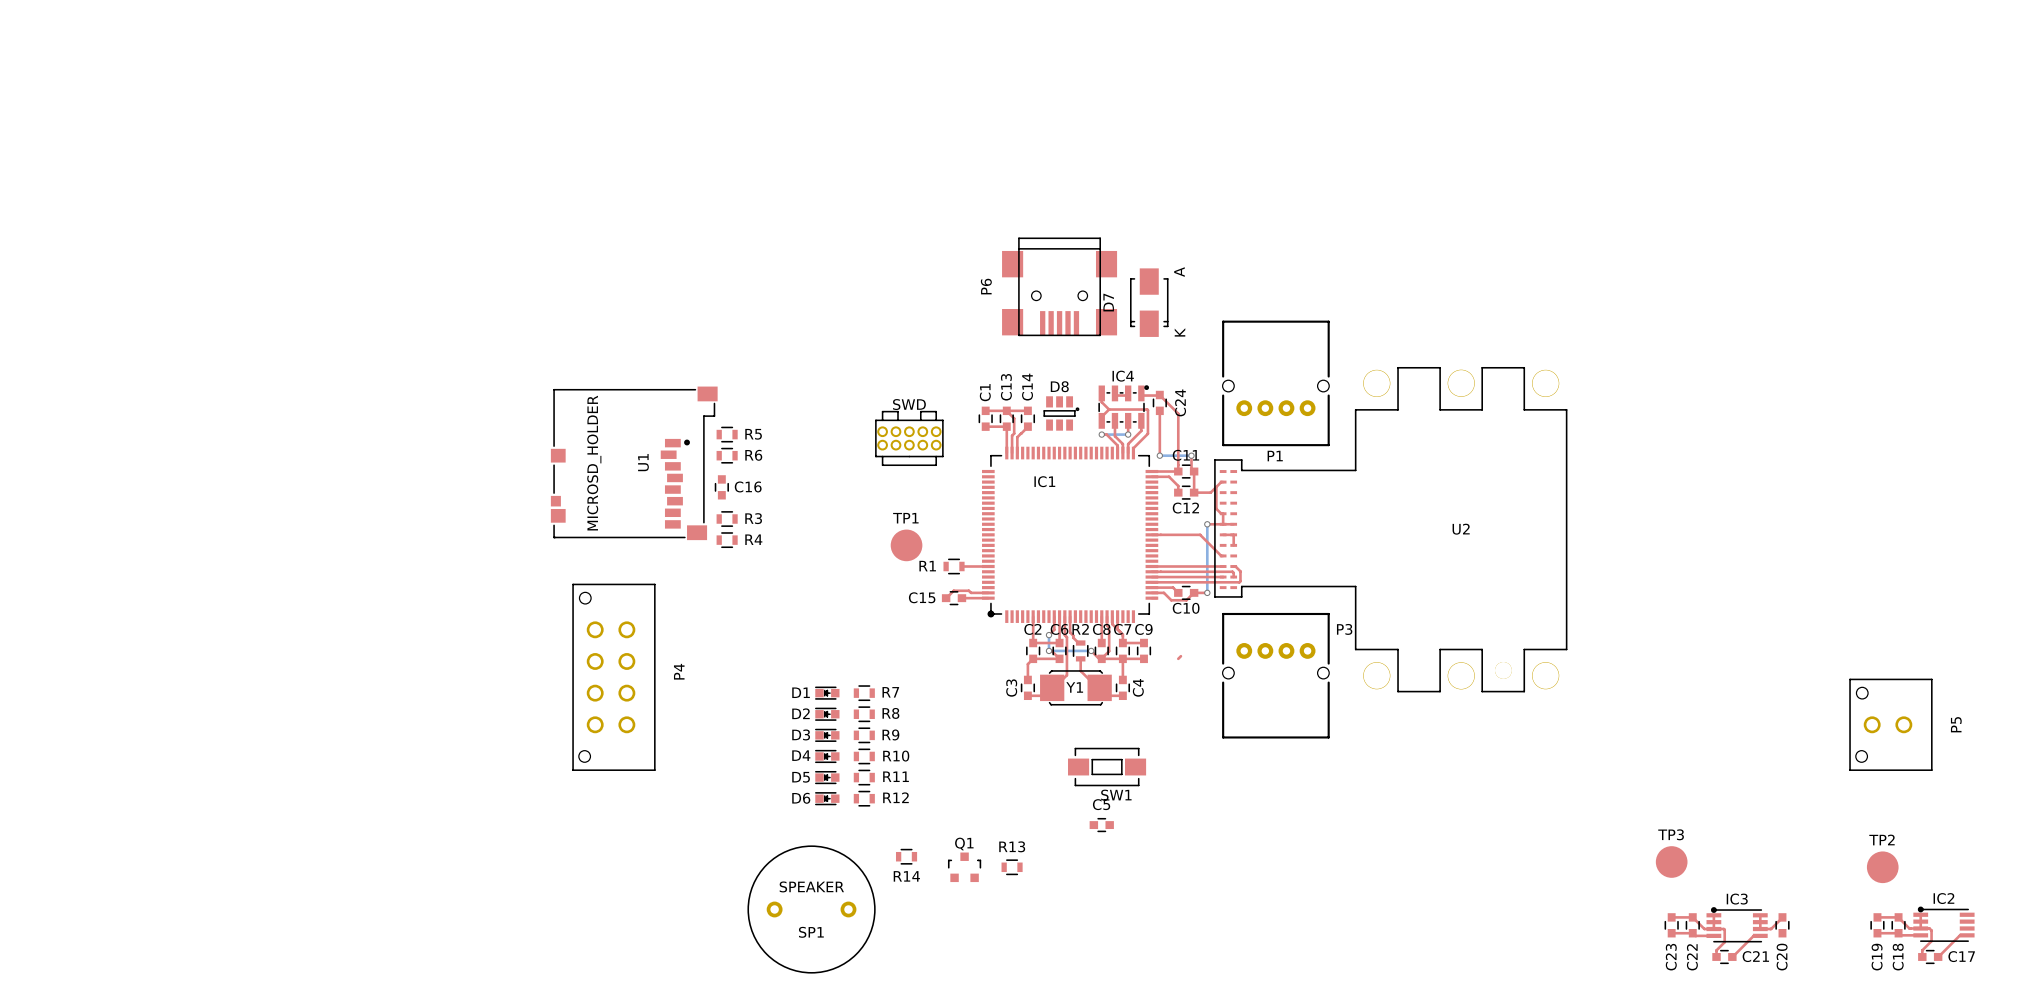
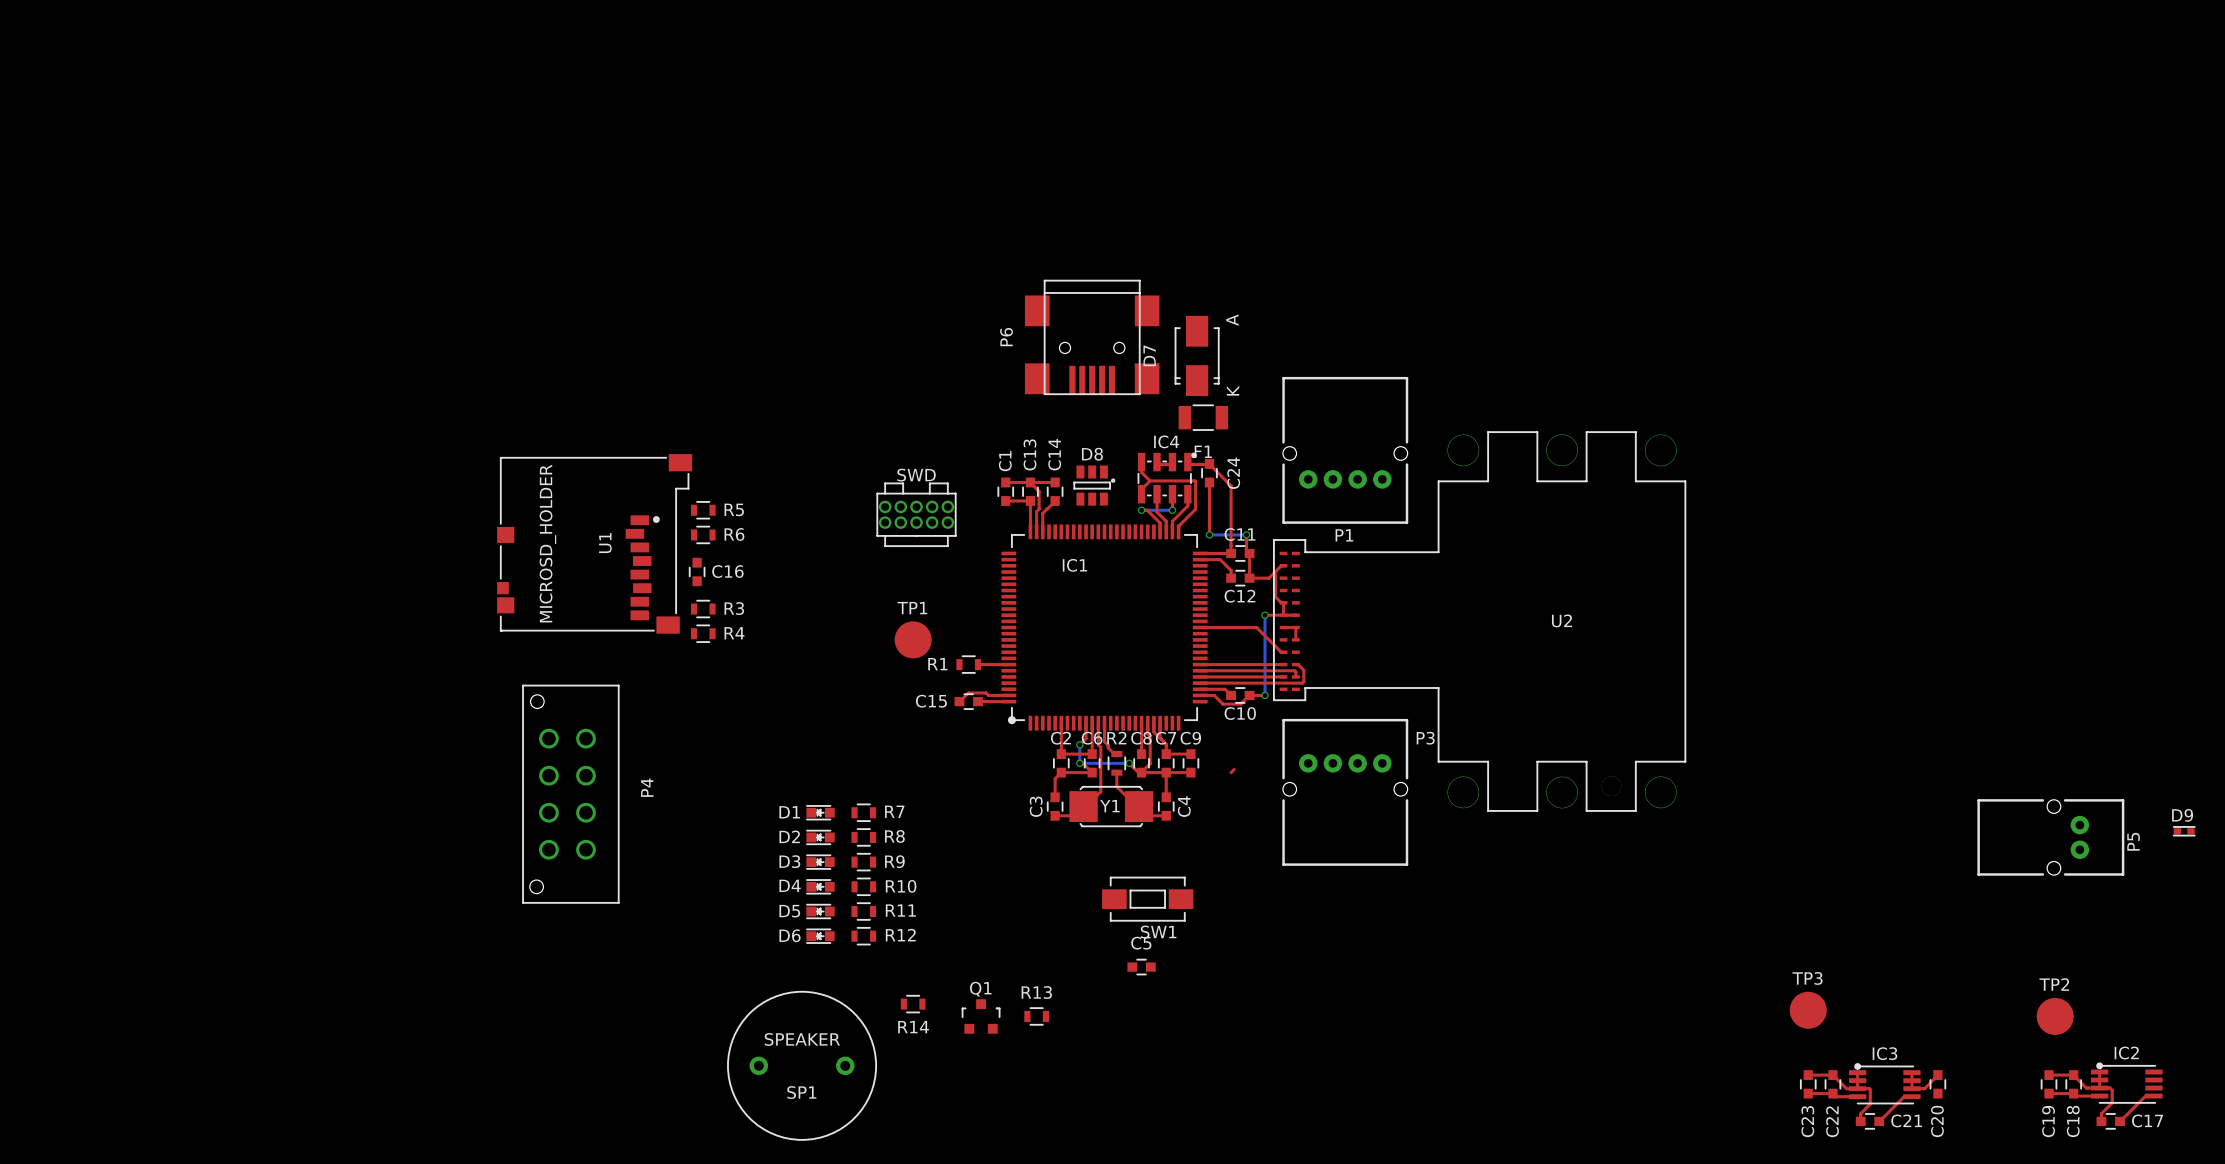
F1: none -> (1203, 417)
P5 footprint: [1849, 678, 1933, 771] -> [1977, 799, 2125, 876]
D9: none -> (2184, 831)

